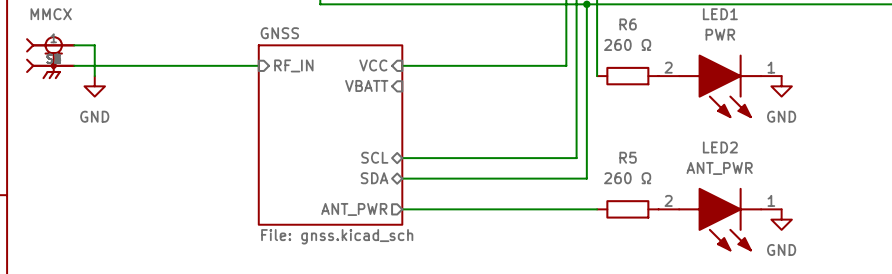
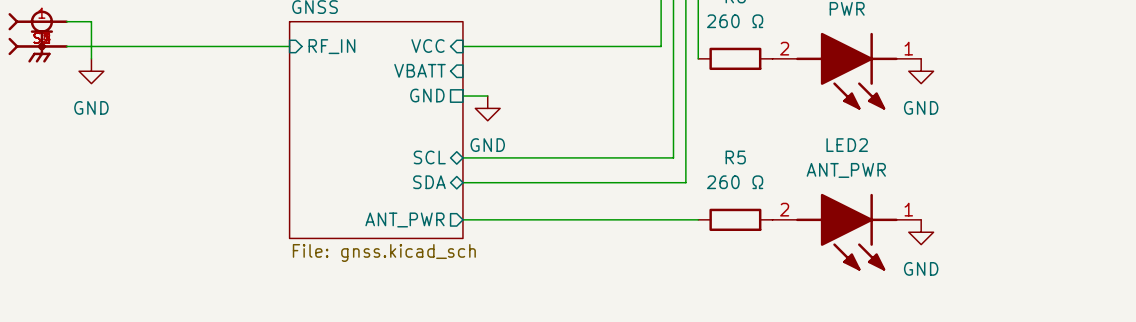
sheet pin: none -> GND (427, 95)
wire: none -> (462, 96) (487, 96)
power symbol: none -> GND (487, 108)

